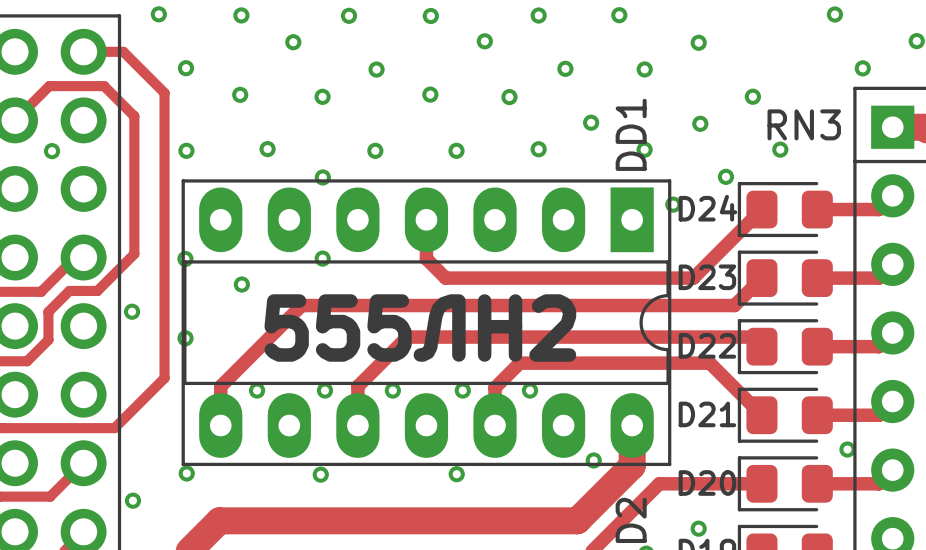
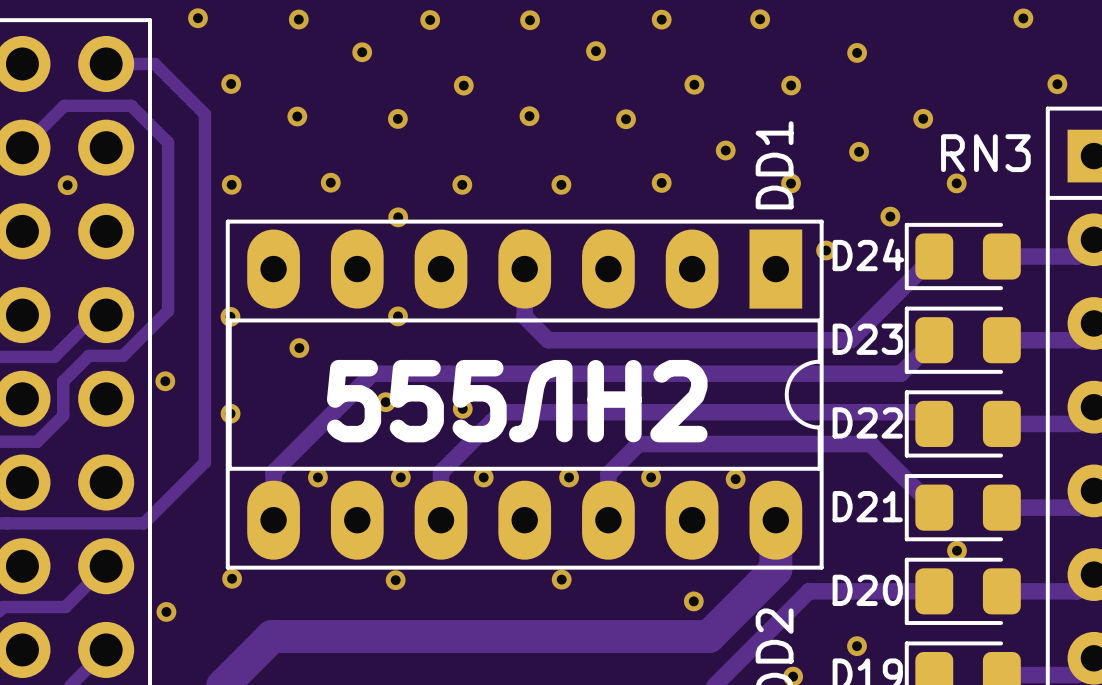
via: none -> (385, 402)
via: none -> (462, 408)
via: none -> (735, 479)
via position: (847, 449) -> (957, 550)
via: (593, 460) -> none
via: none -> (693, 601)

